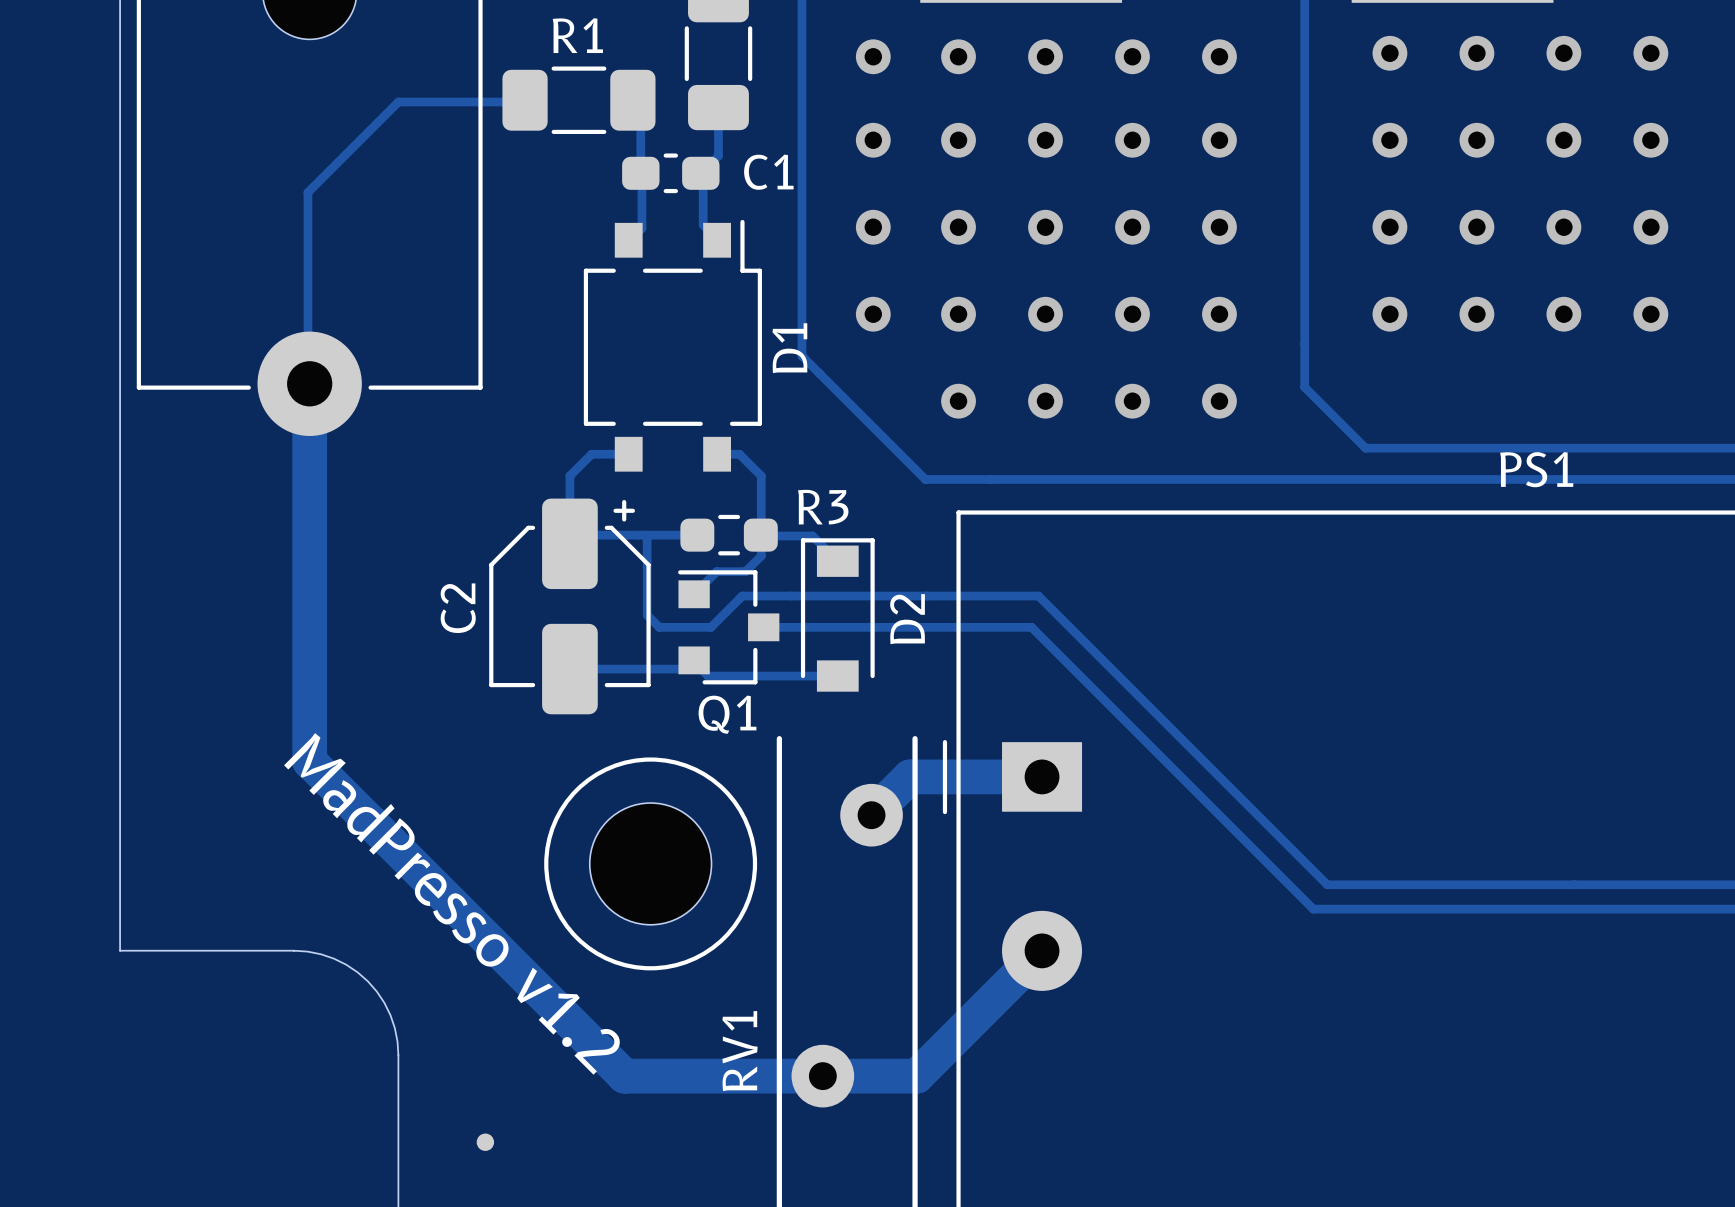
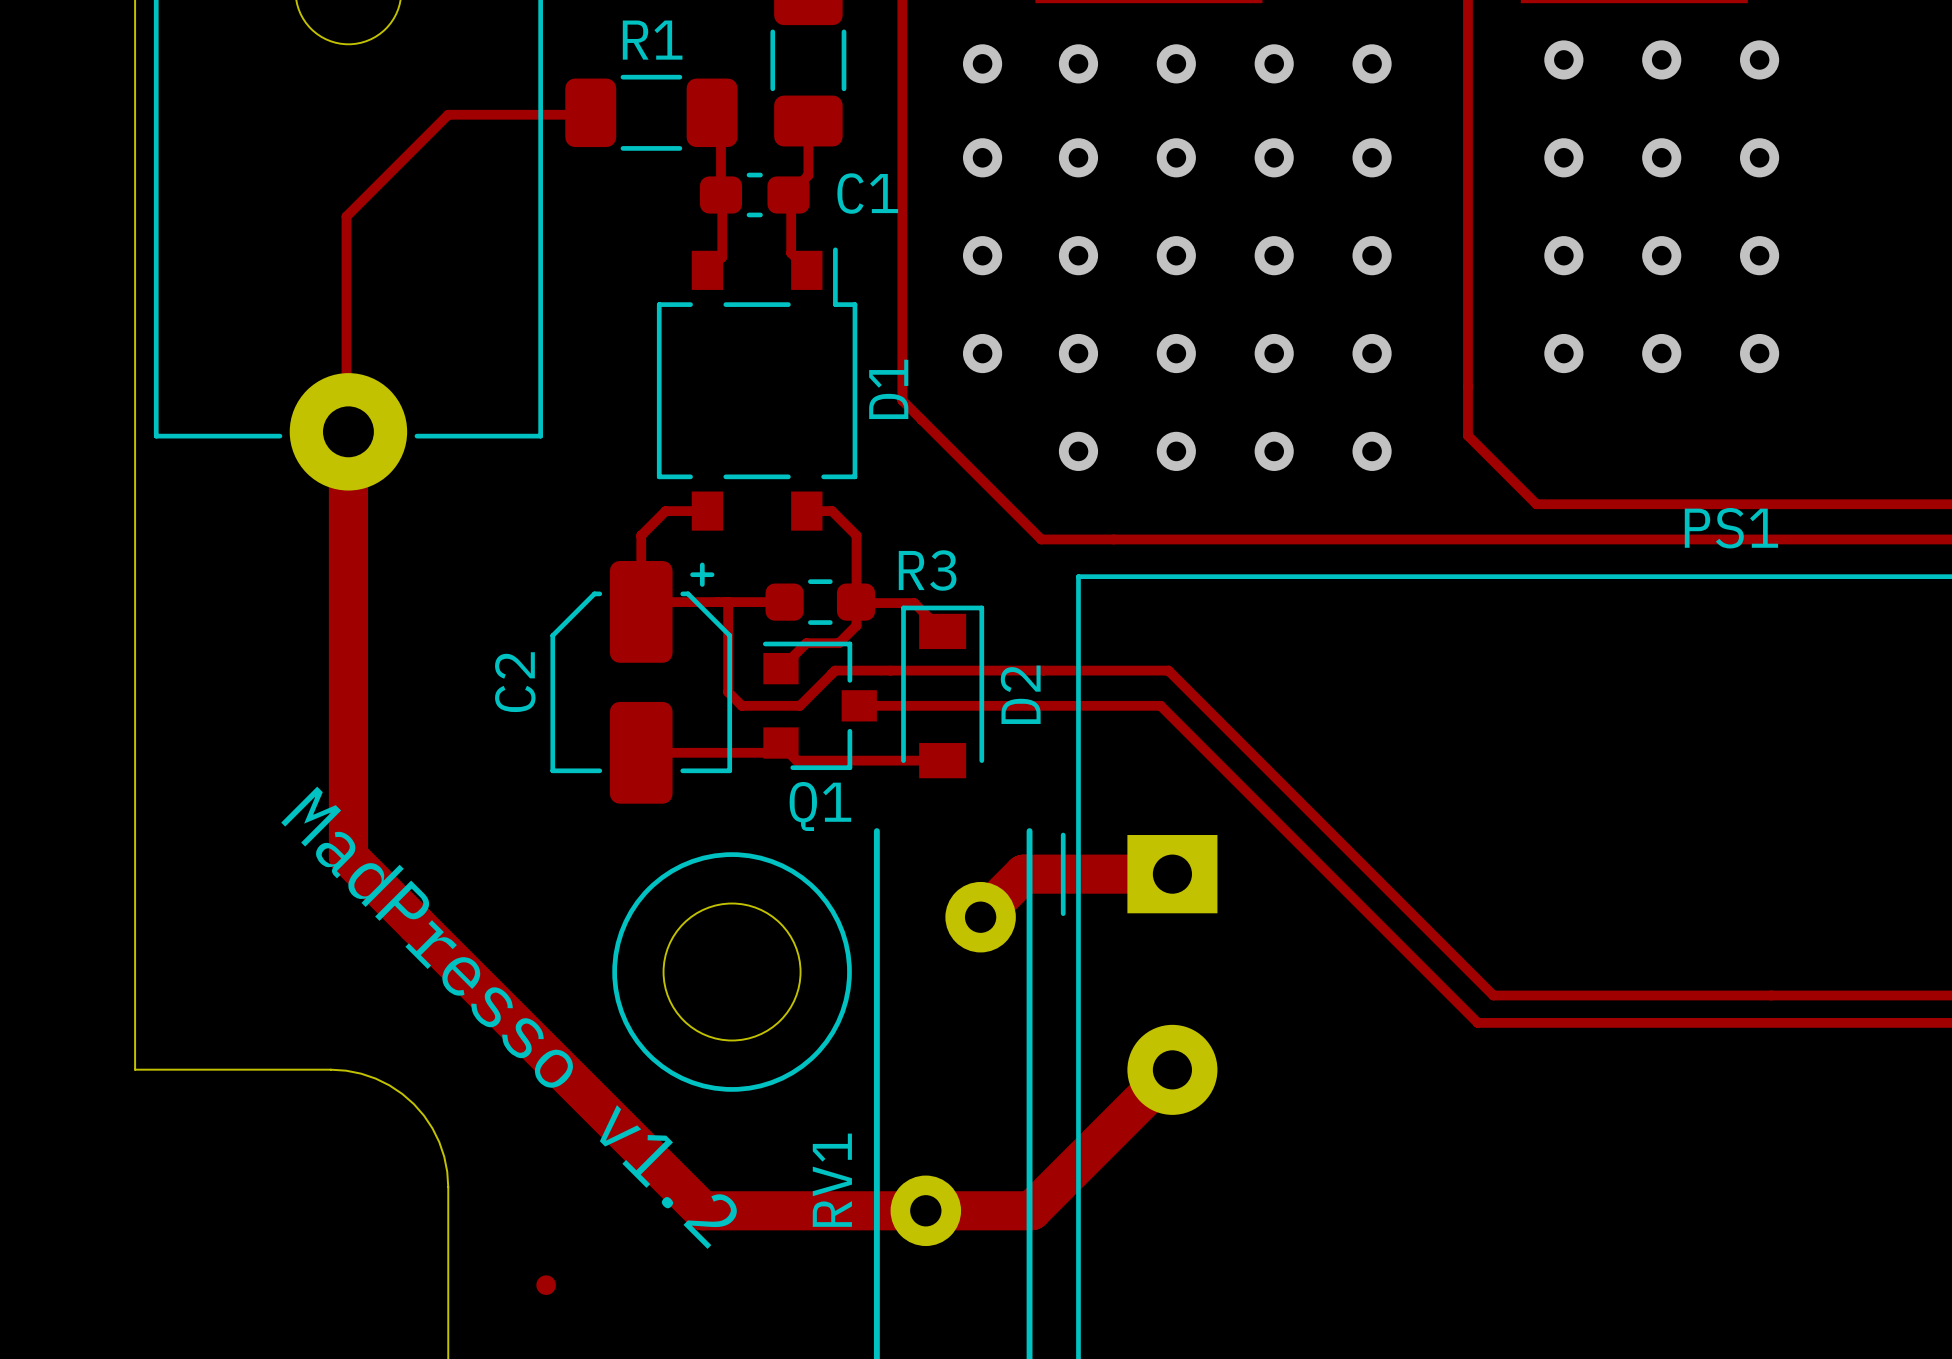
via: (1650, 53) -> none
via: (1650, 140) -> none
via: (1650, 227) -> none
via: (1650, 314) -> none

